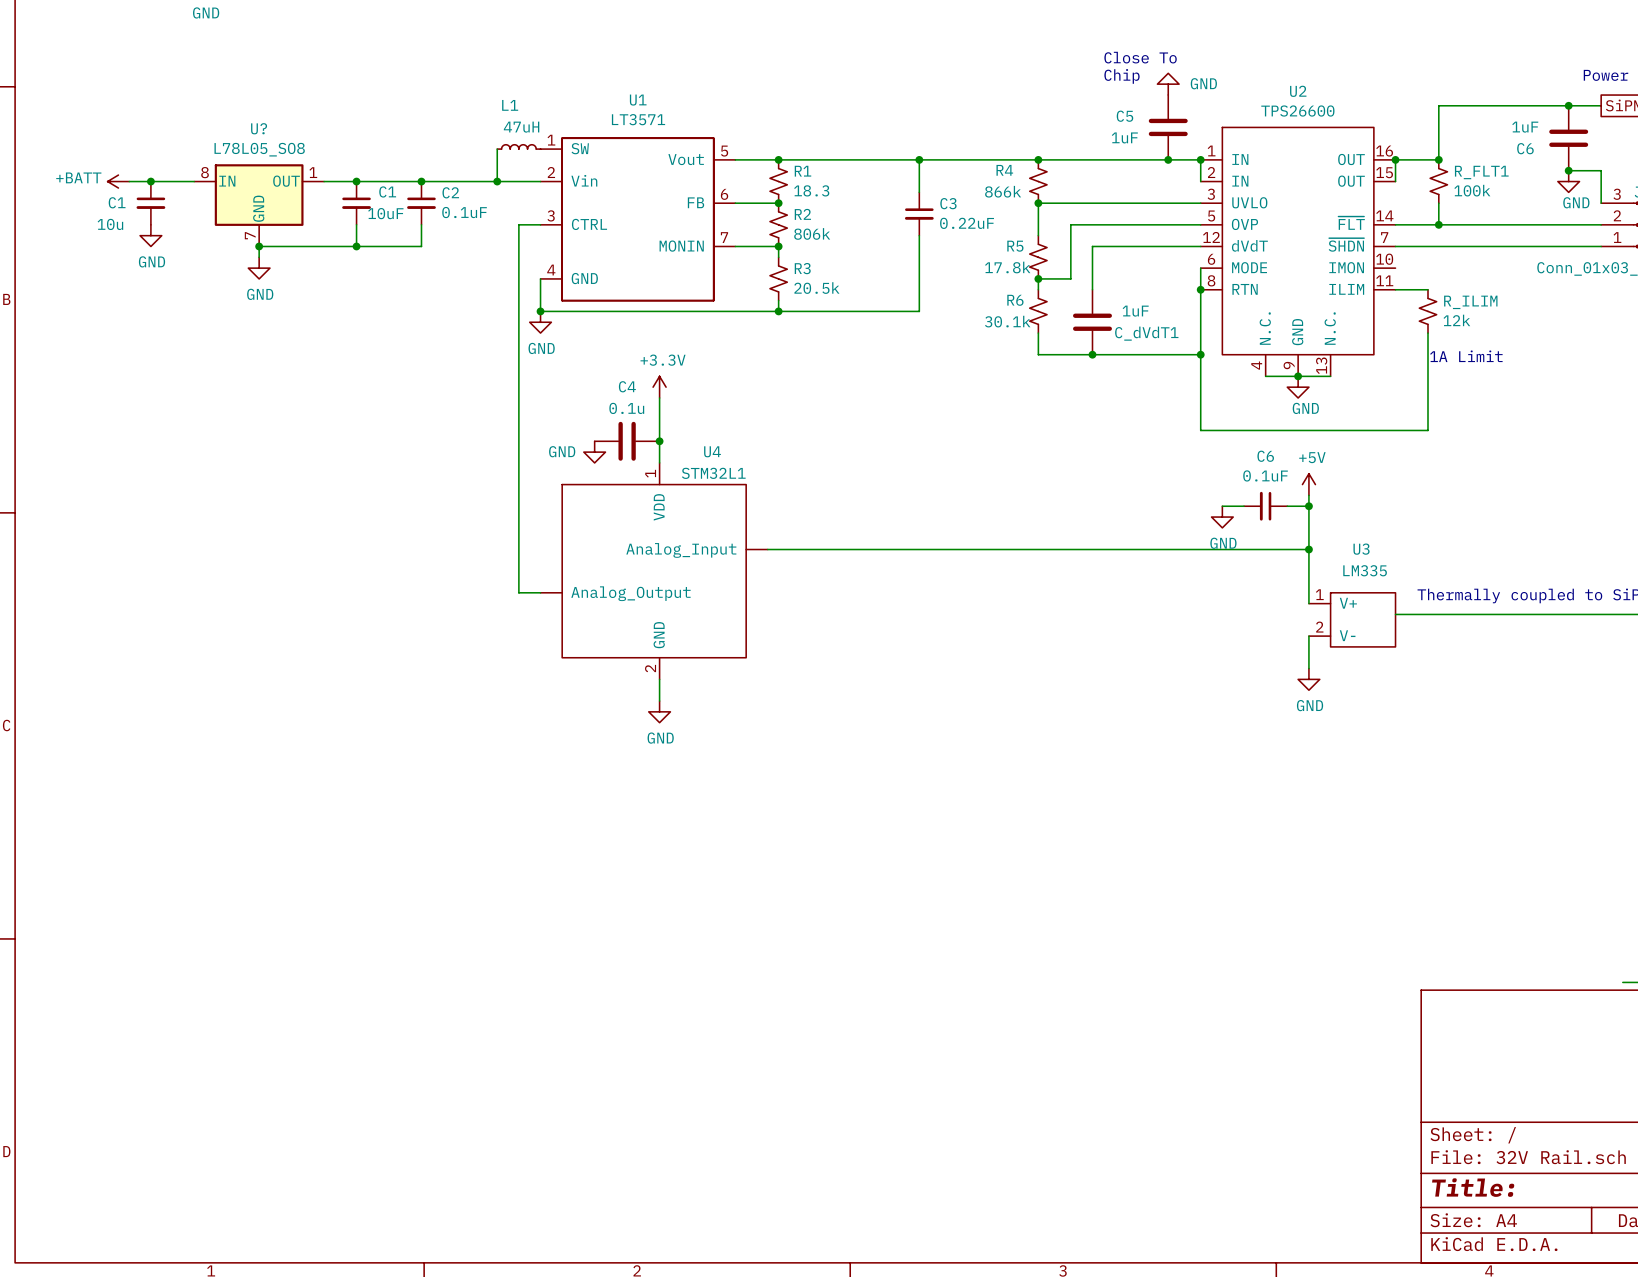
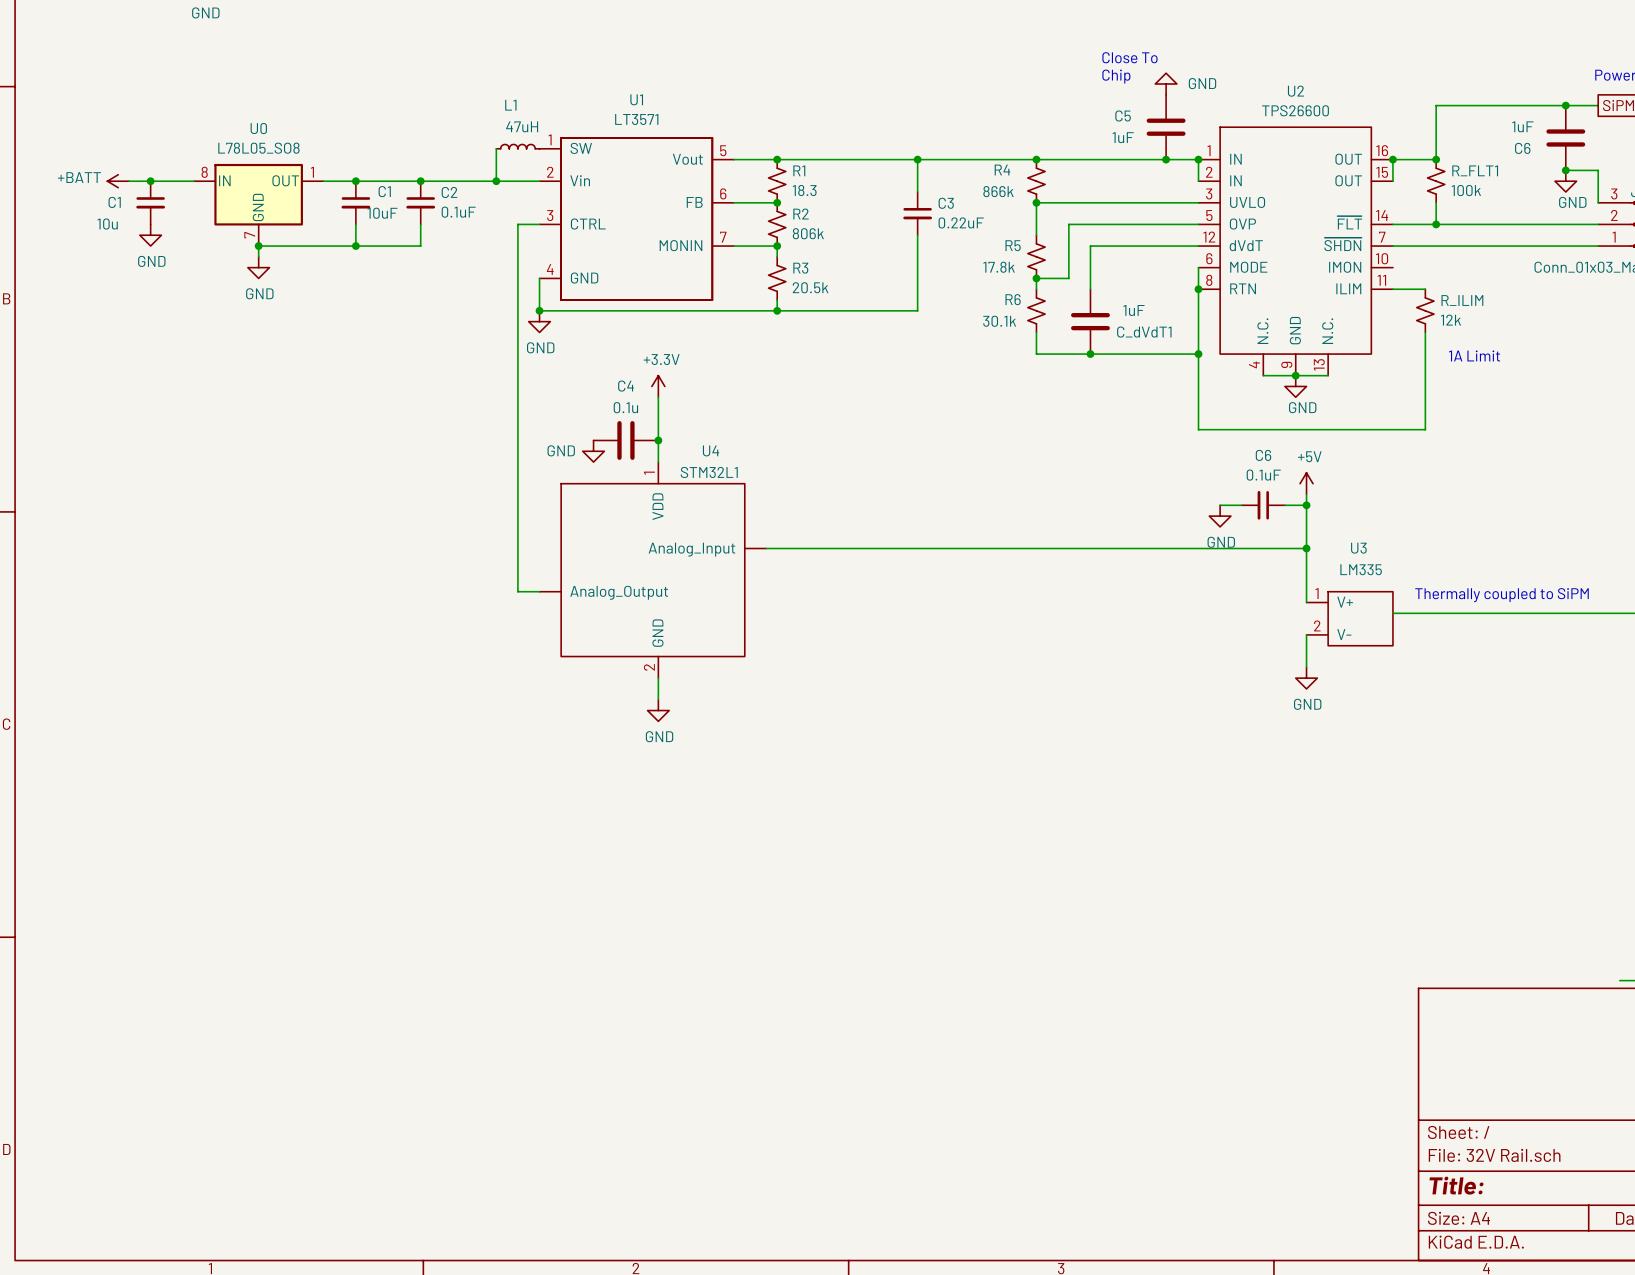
U? name: U? (259, 128) -> U0 (258, 128)

